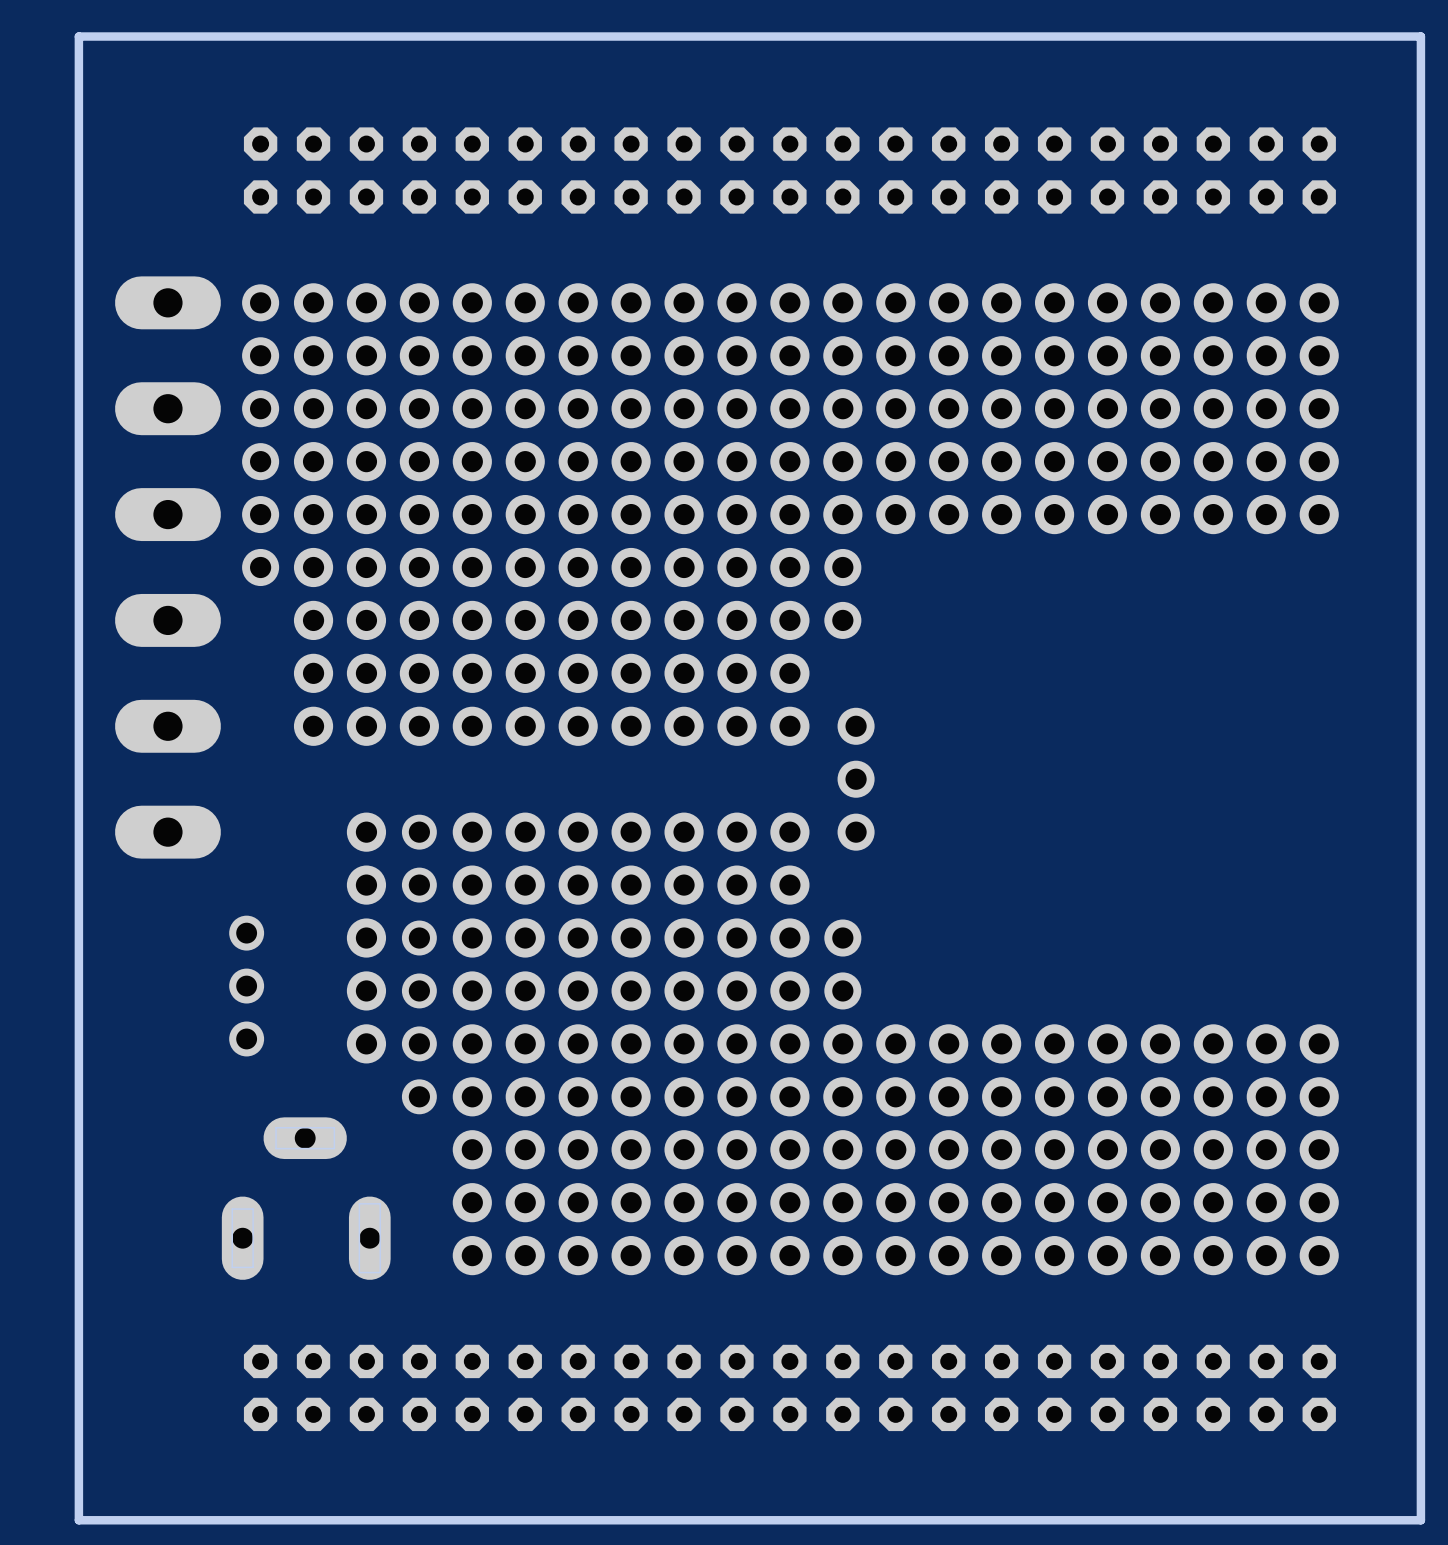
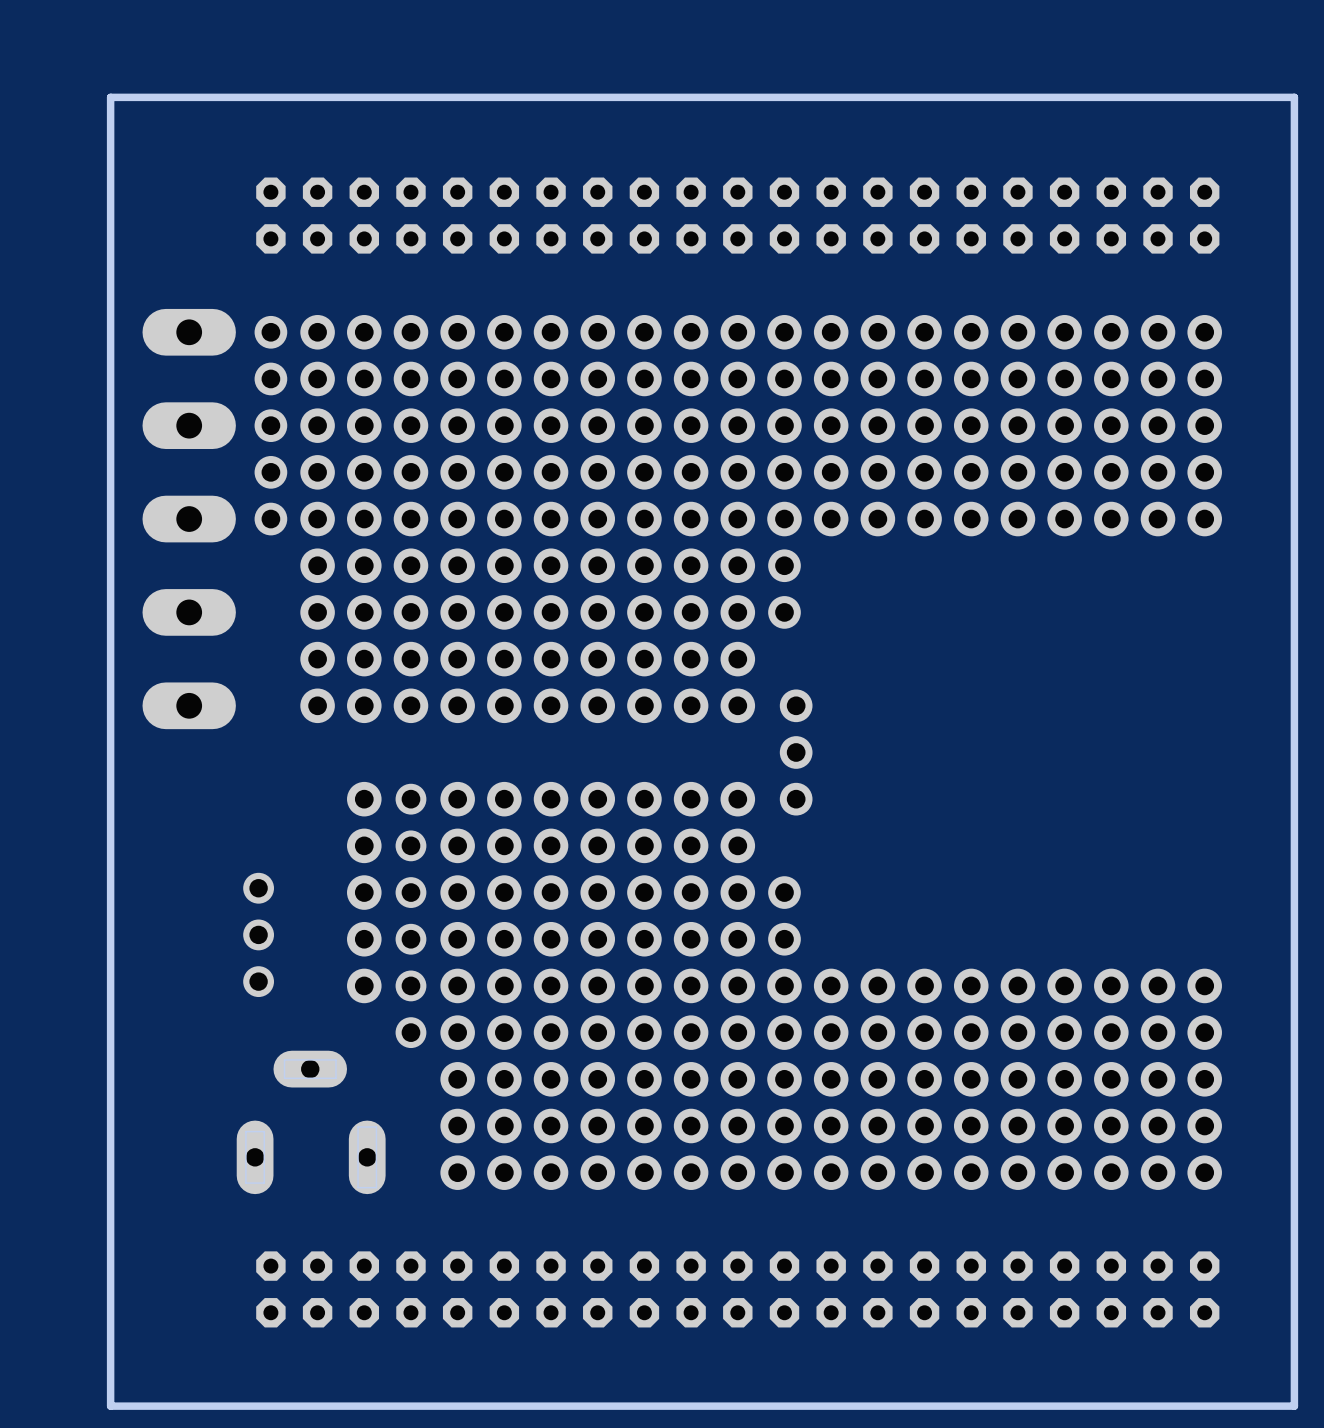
part: (260, 567) -> none
part: (167, 832) -> none

